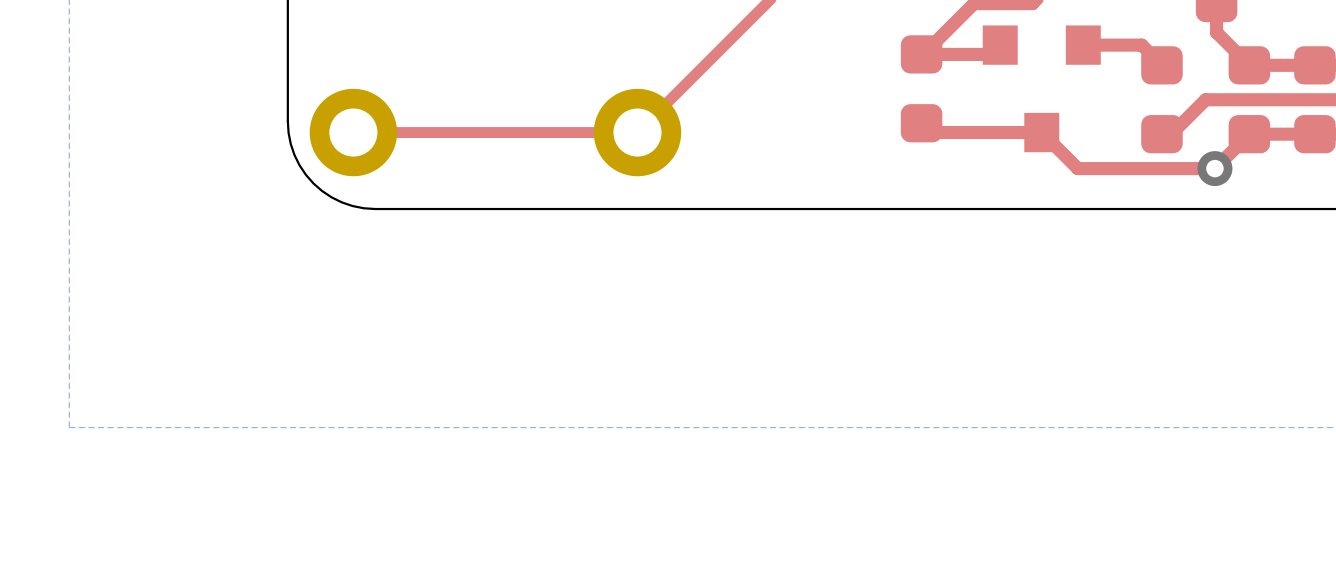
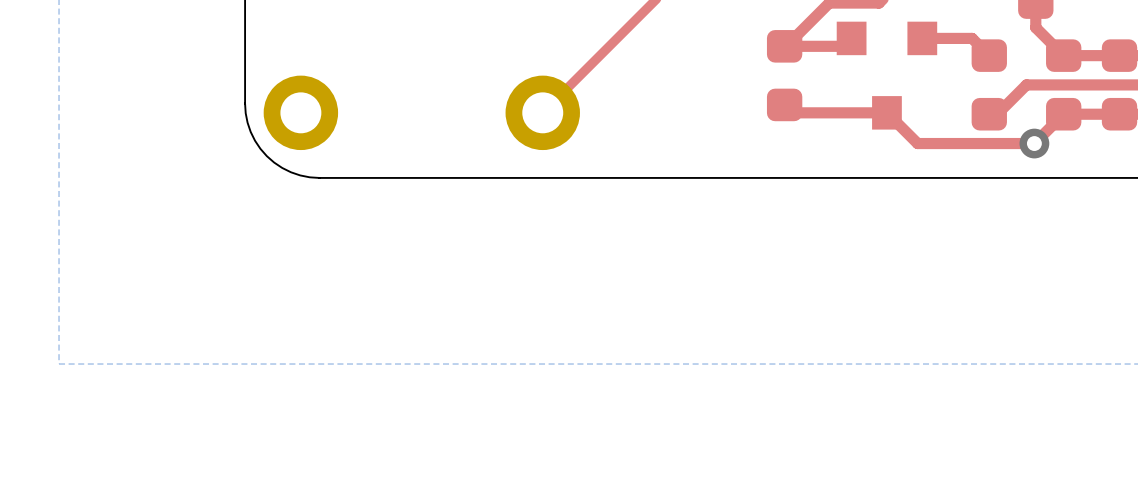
top track: (637, 132) (353, 132) -> none

